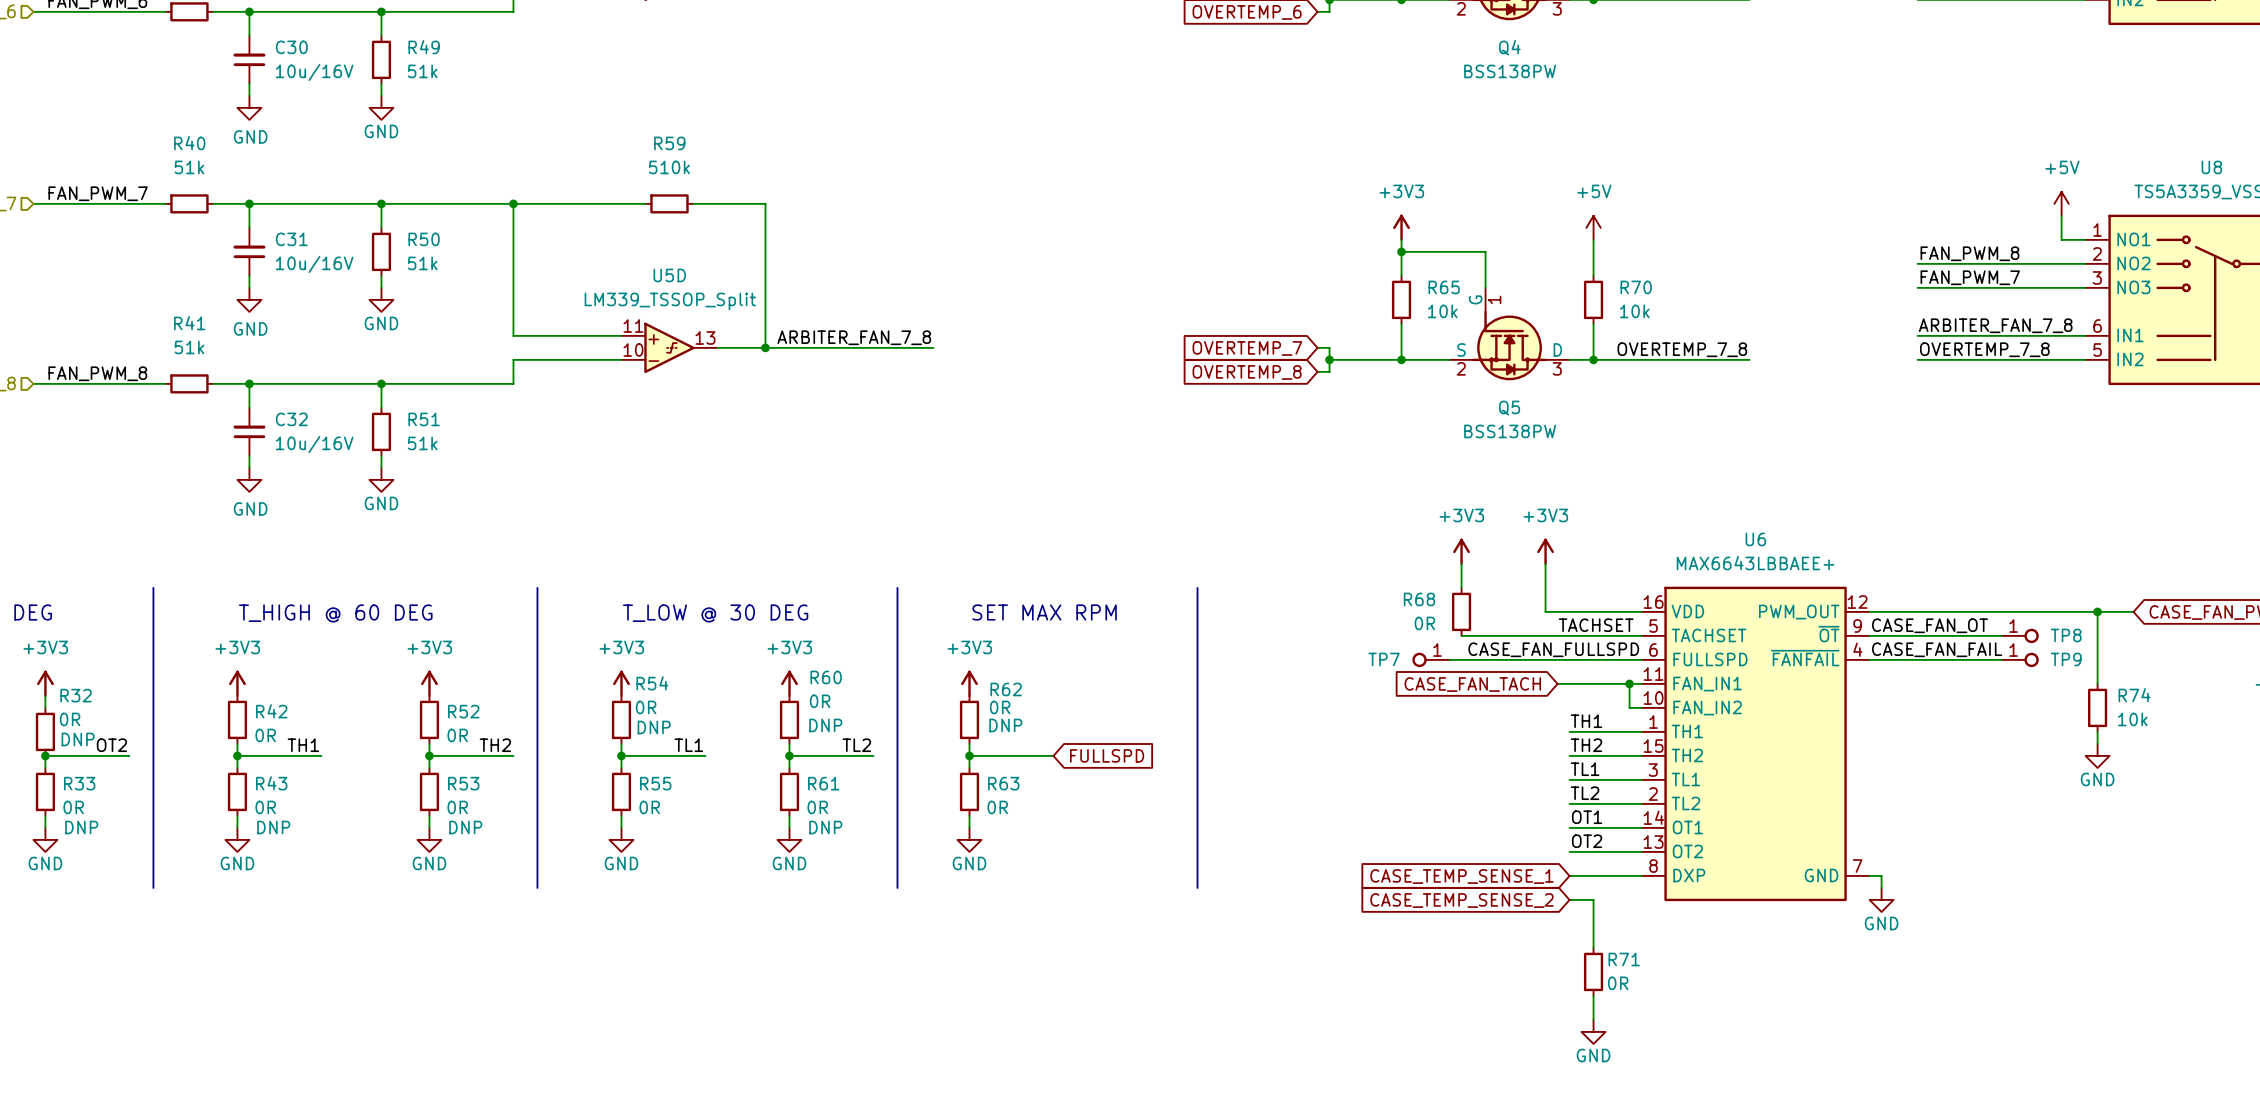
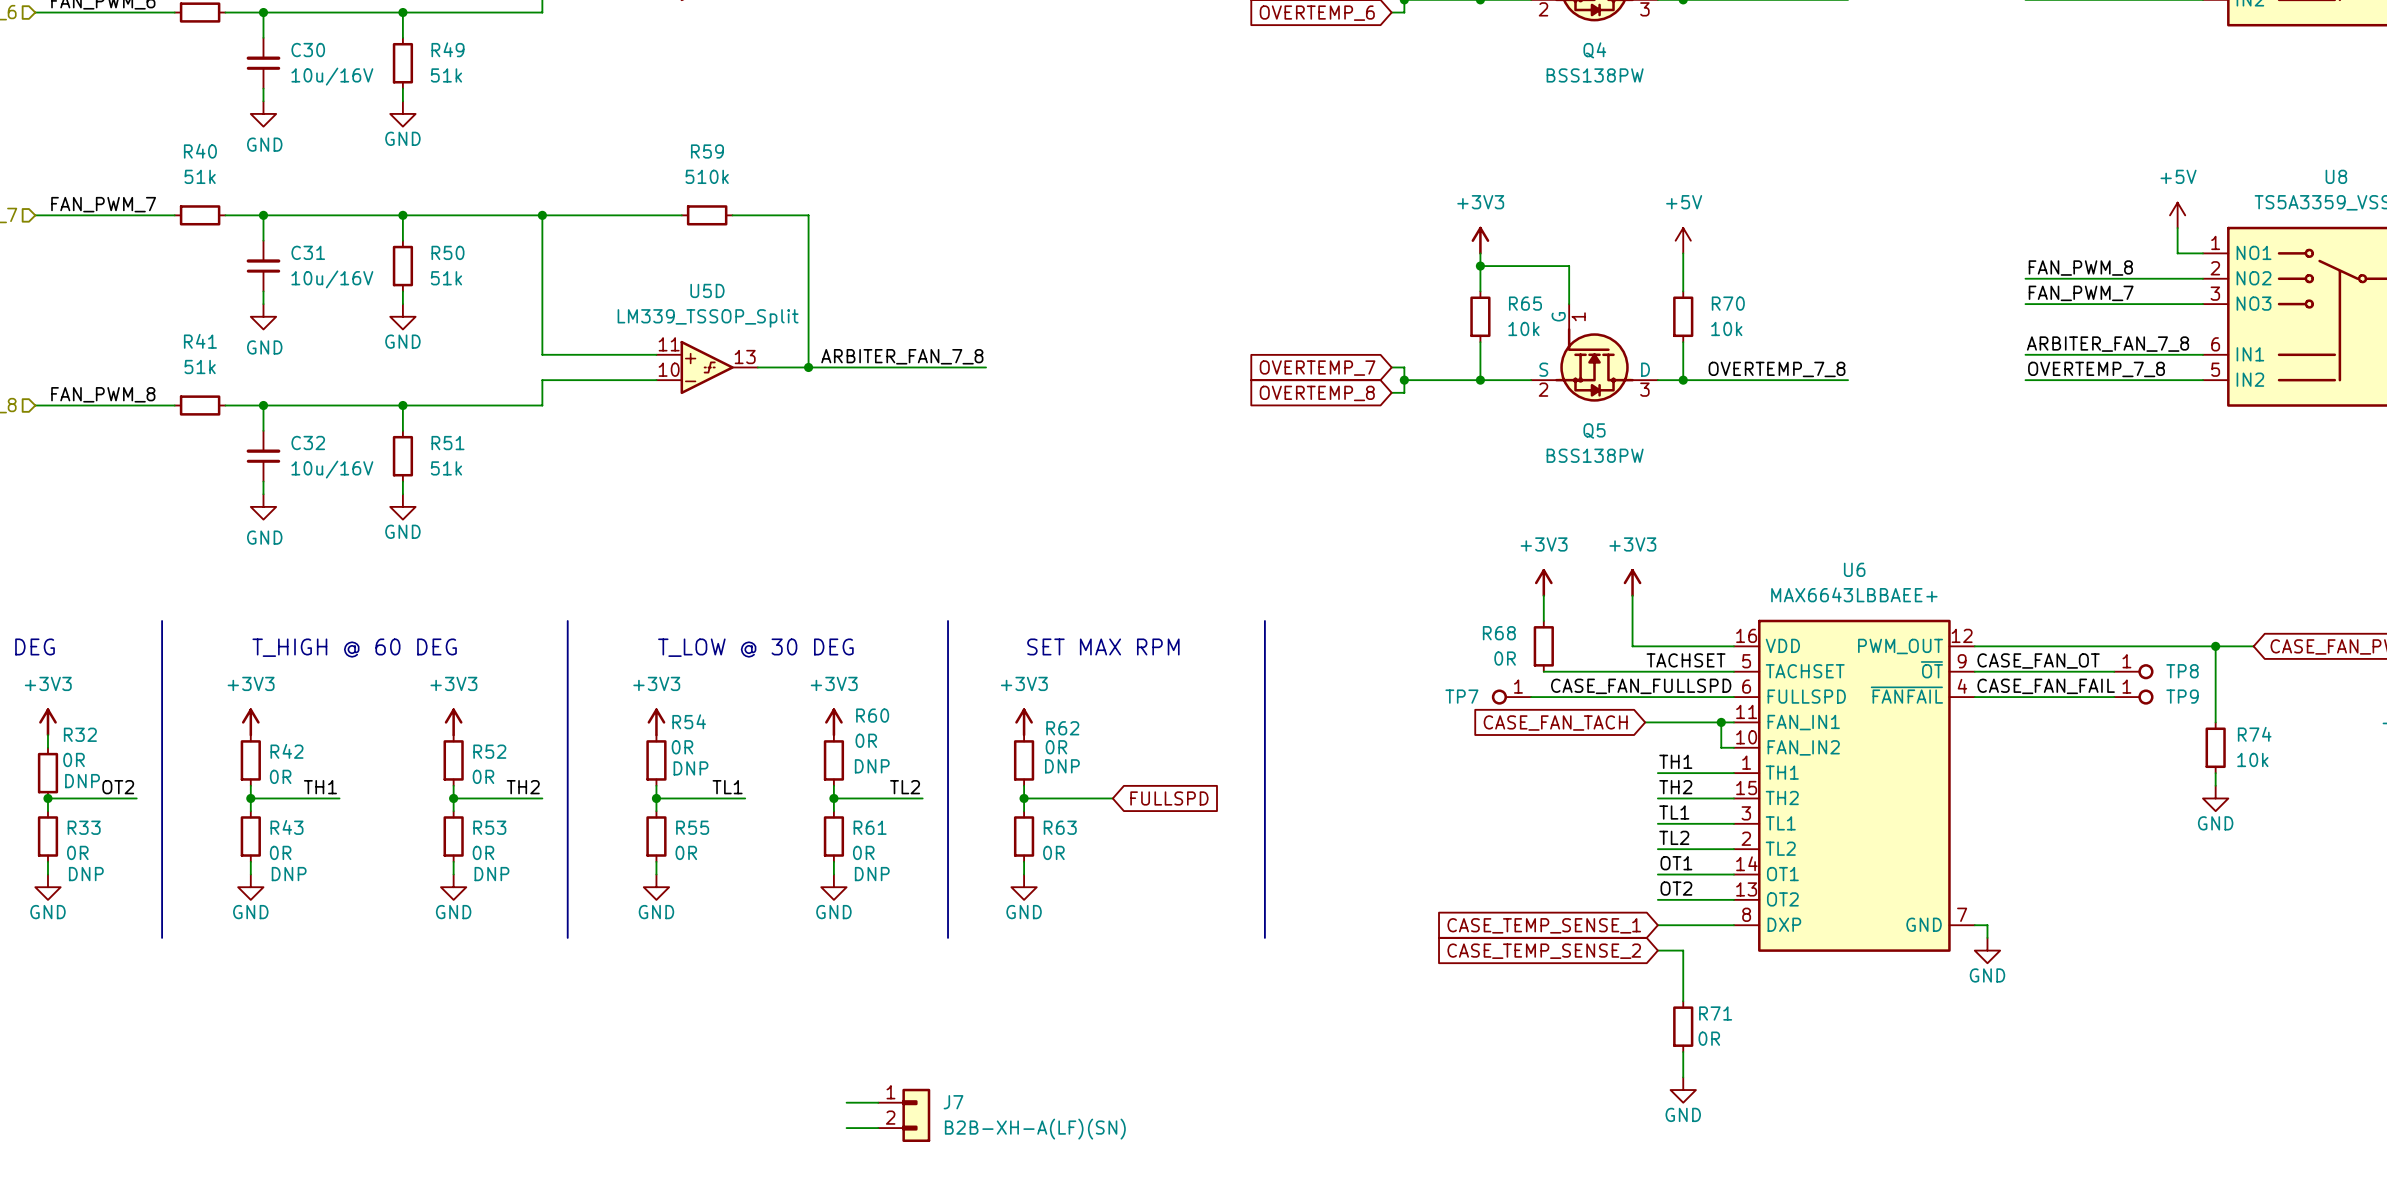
wire: none -> (846, 1102) (878, 1102)
J7: none -> (904, 1115)
wire: none -> (846, 1128) (878, 1128)

